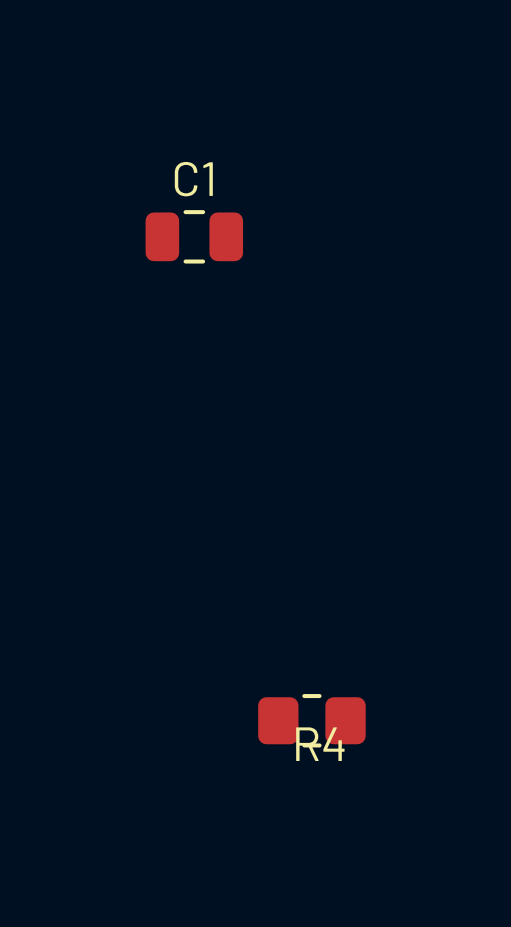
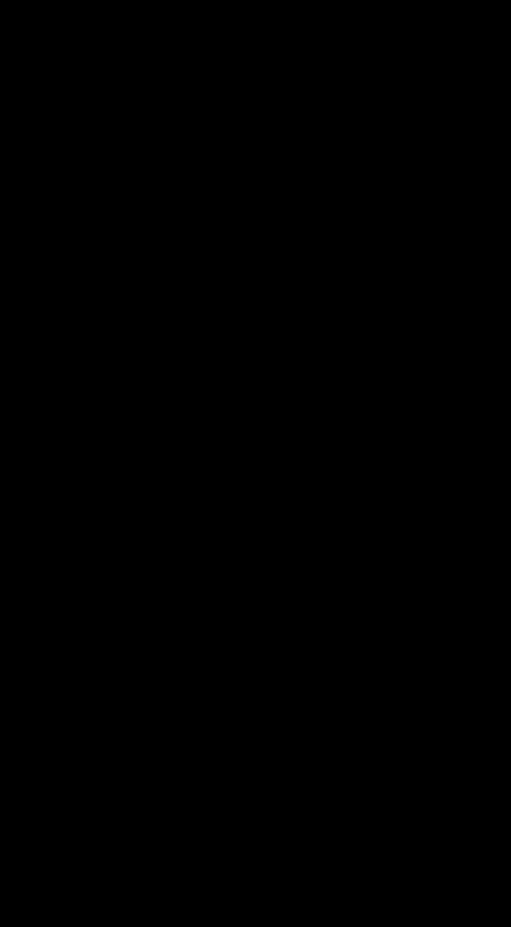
C1: (194, 236) -> none
R4: (311, 720) -> none

